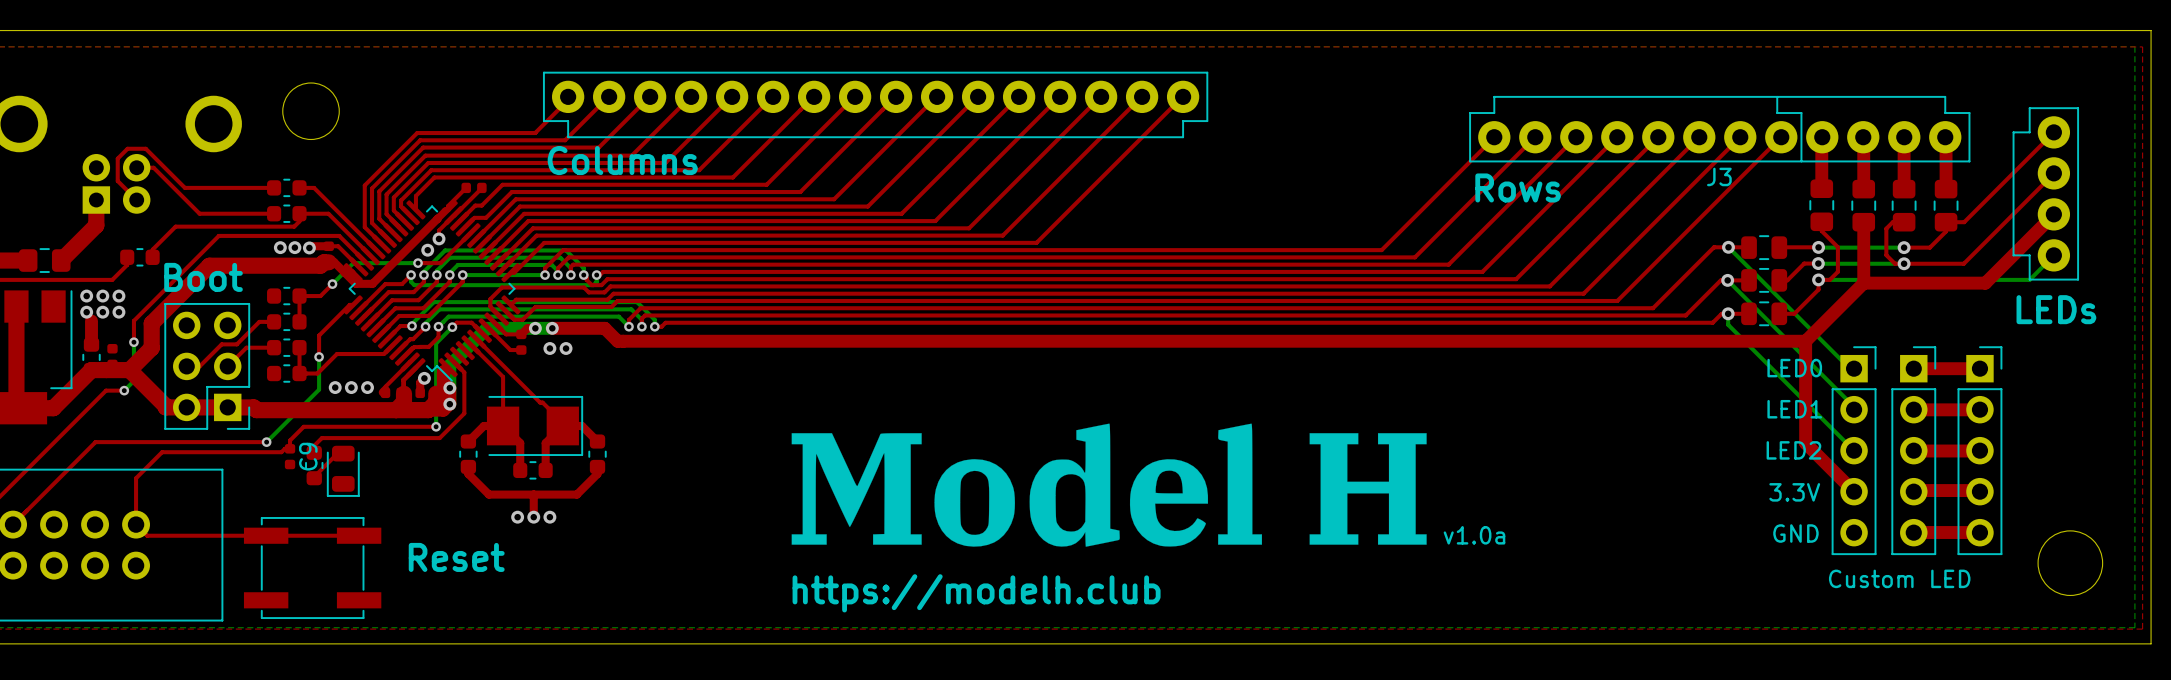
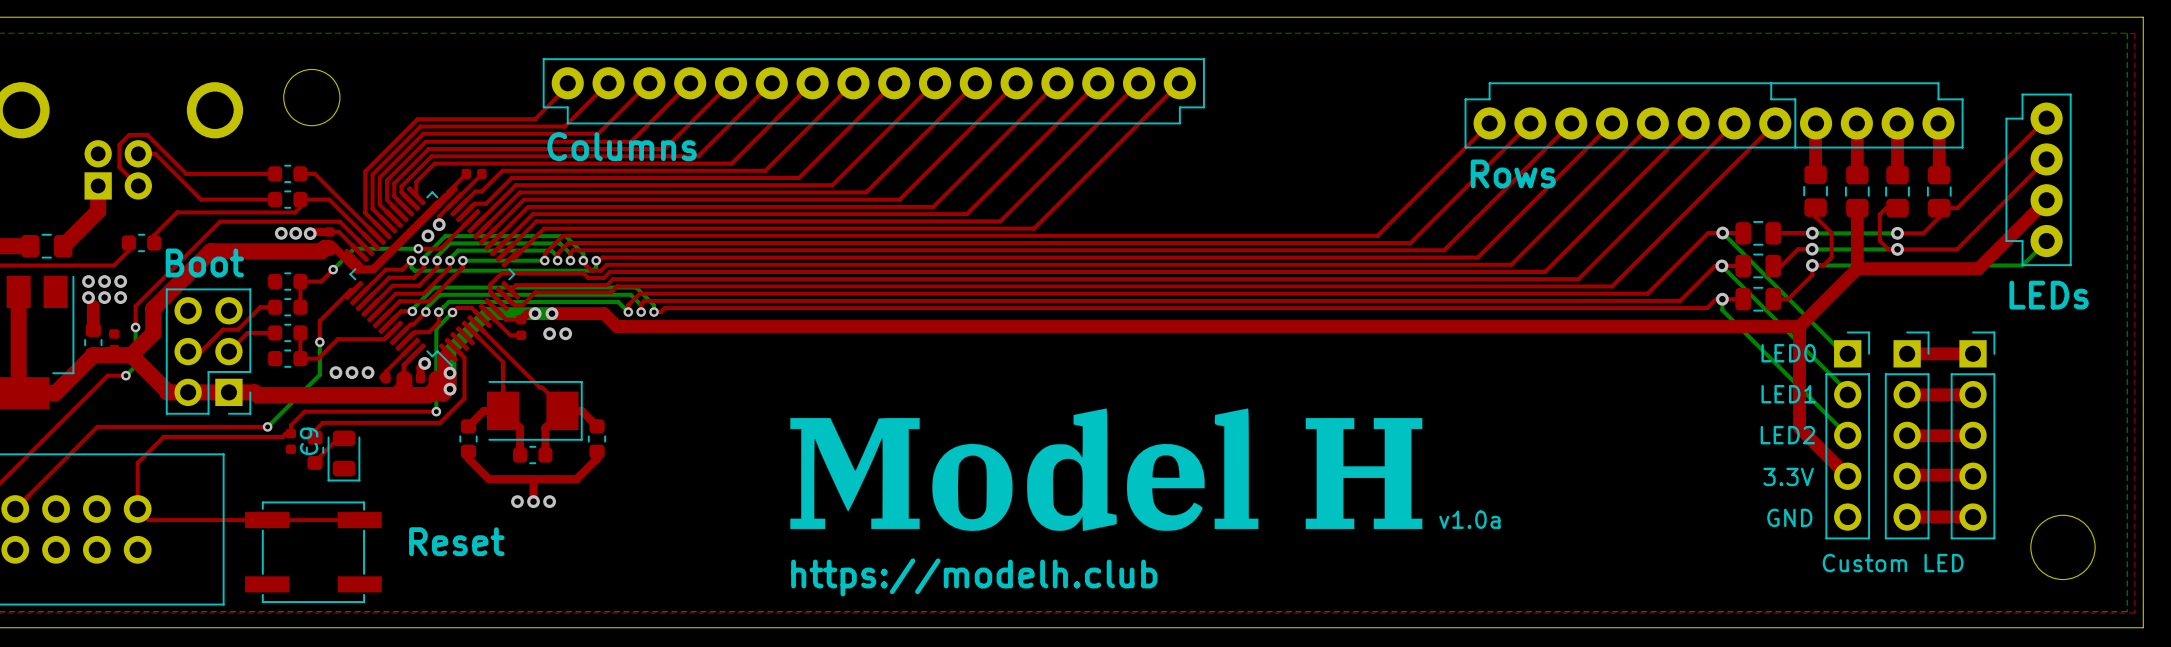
J3 name: J3 (1719, 176) -> none

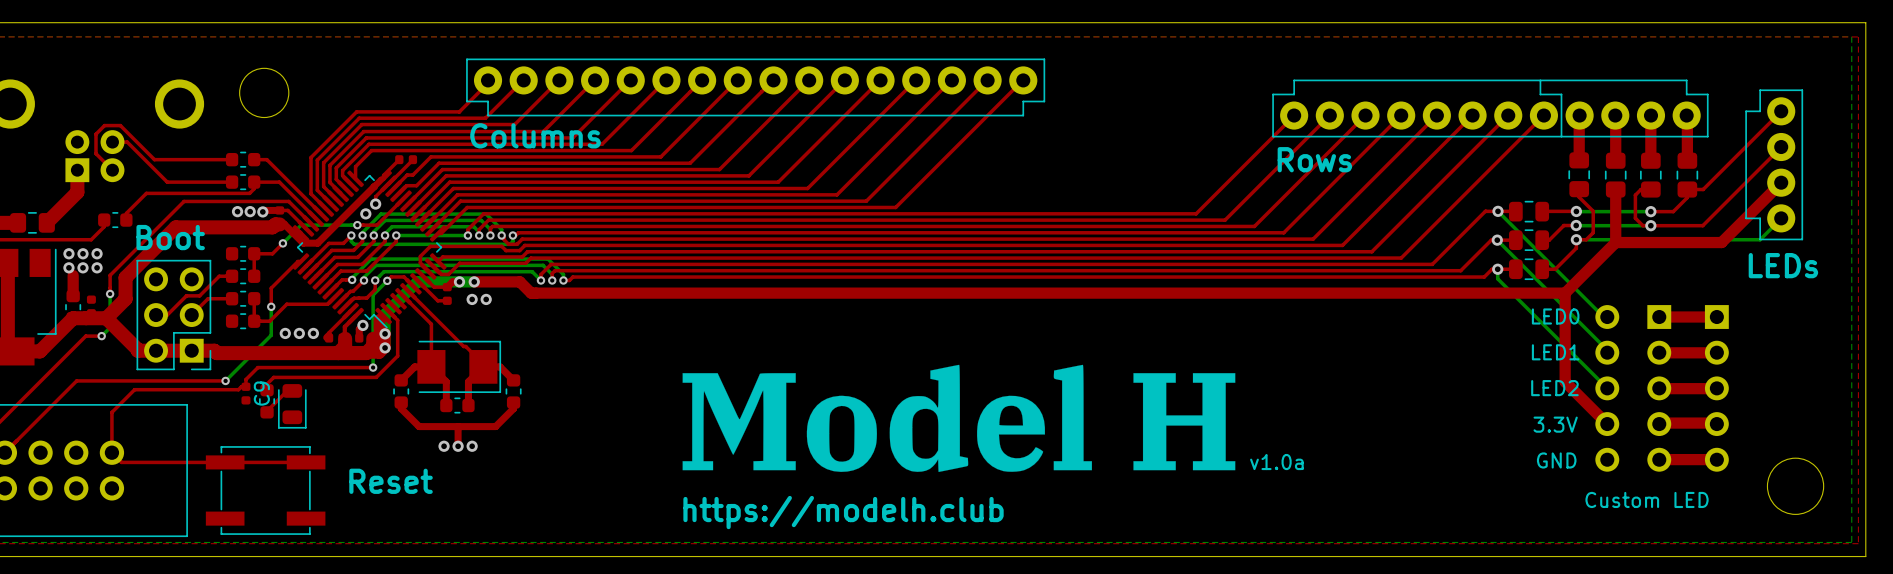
part footprint: [1825, 331, 1871, 540] -> [1595, 305, 1620, 472]
part footprint: [1884, 331, 1930, 540] -> [1647, 305, 1672, 472]
part footprint: [1950, 331, 1996, 540] -> [1704, 305, 1729, 472]

